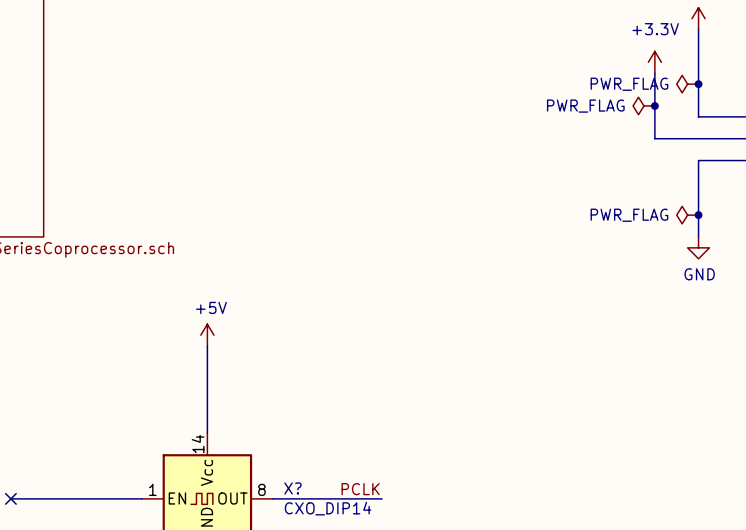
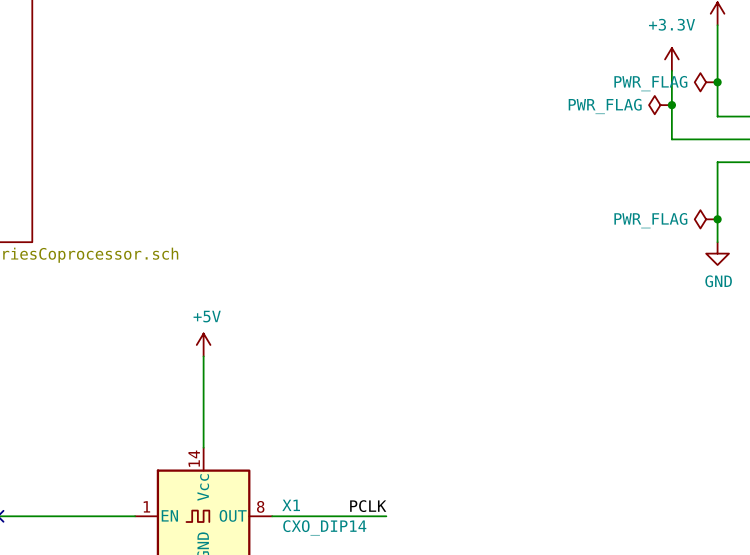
X? name: X? (292, 488) -> X1 (291, 505)

